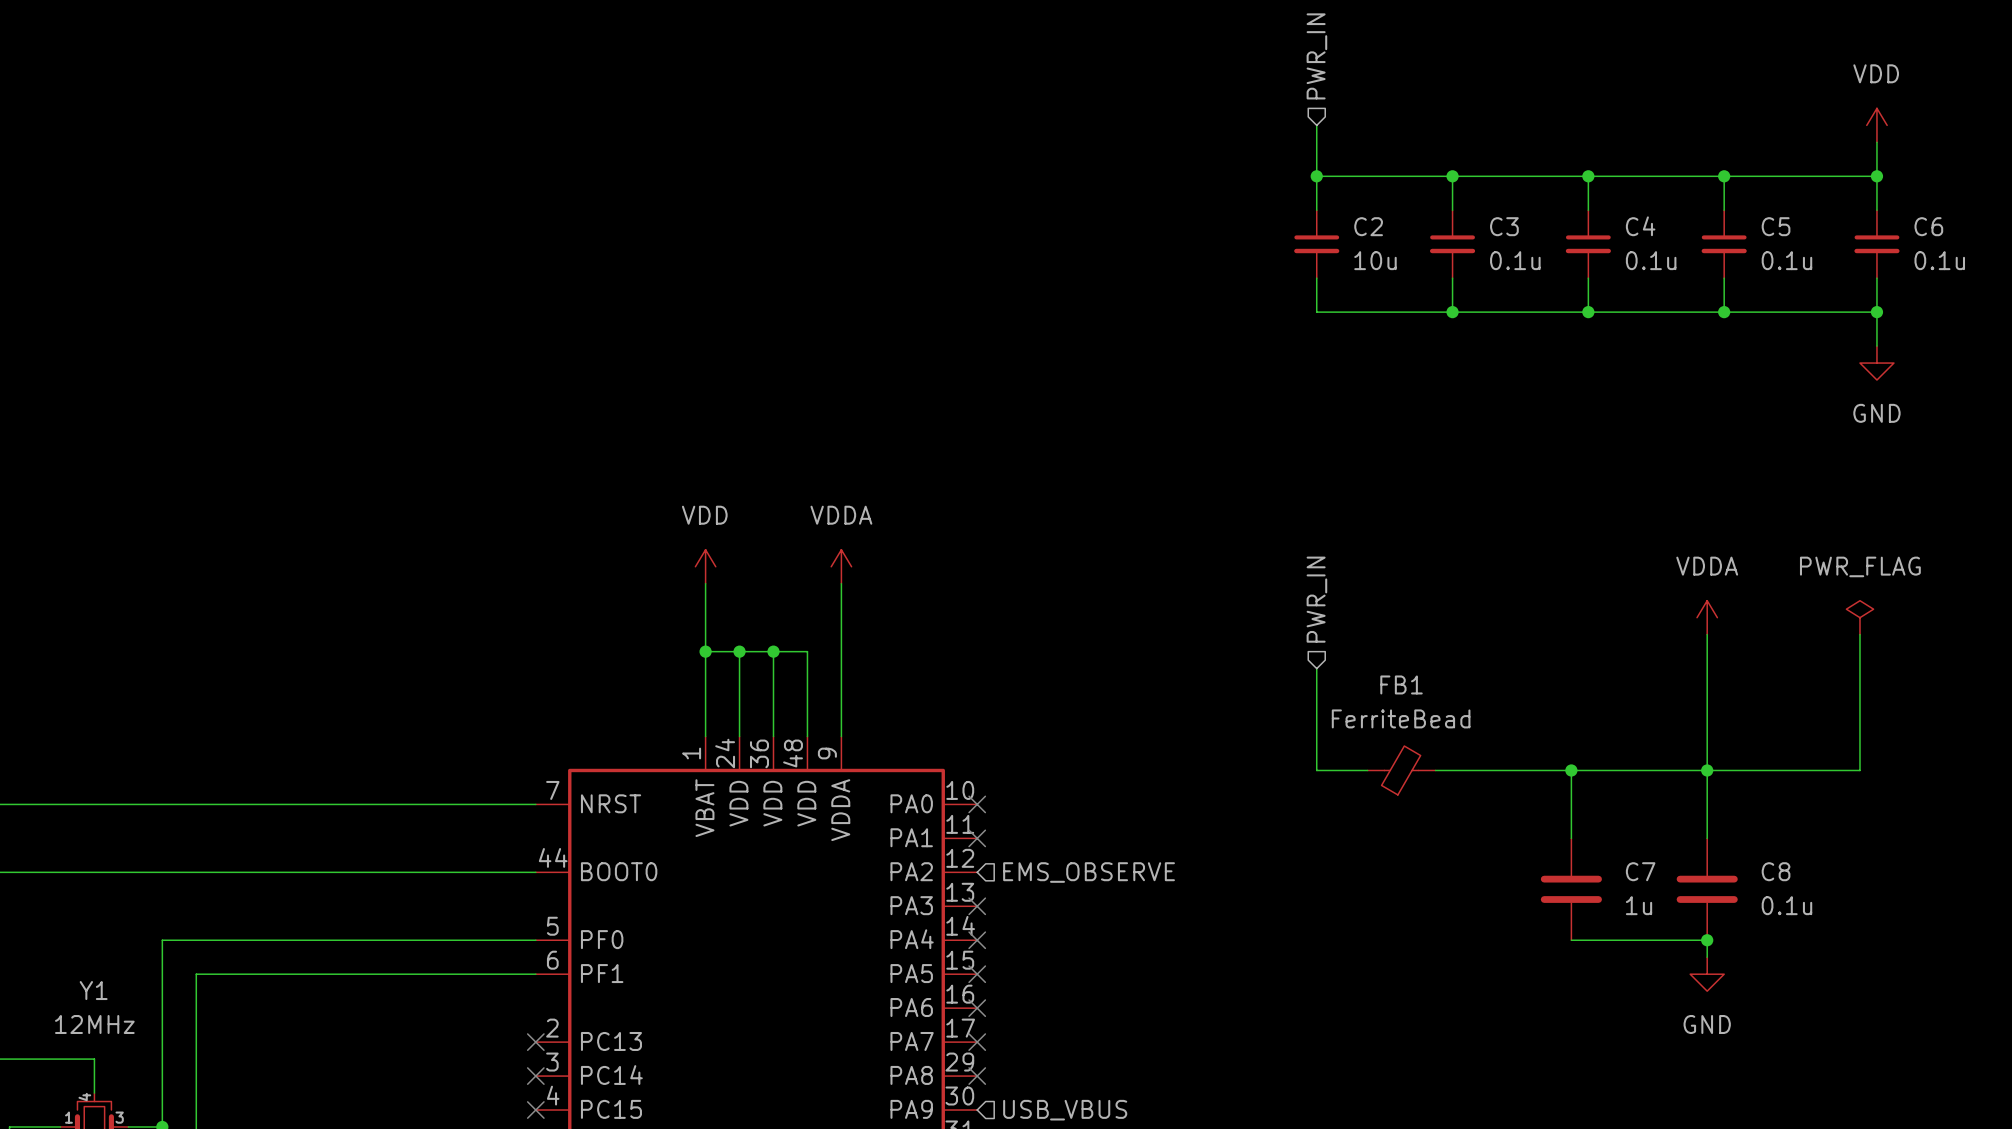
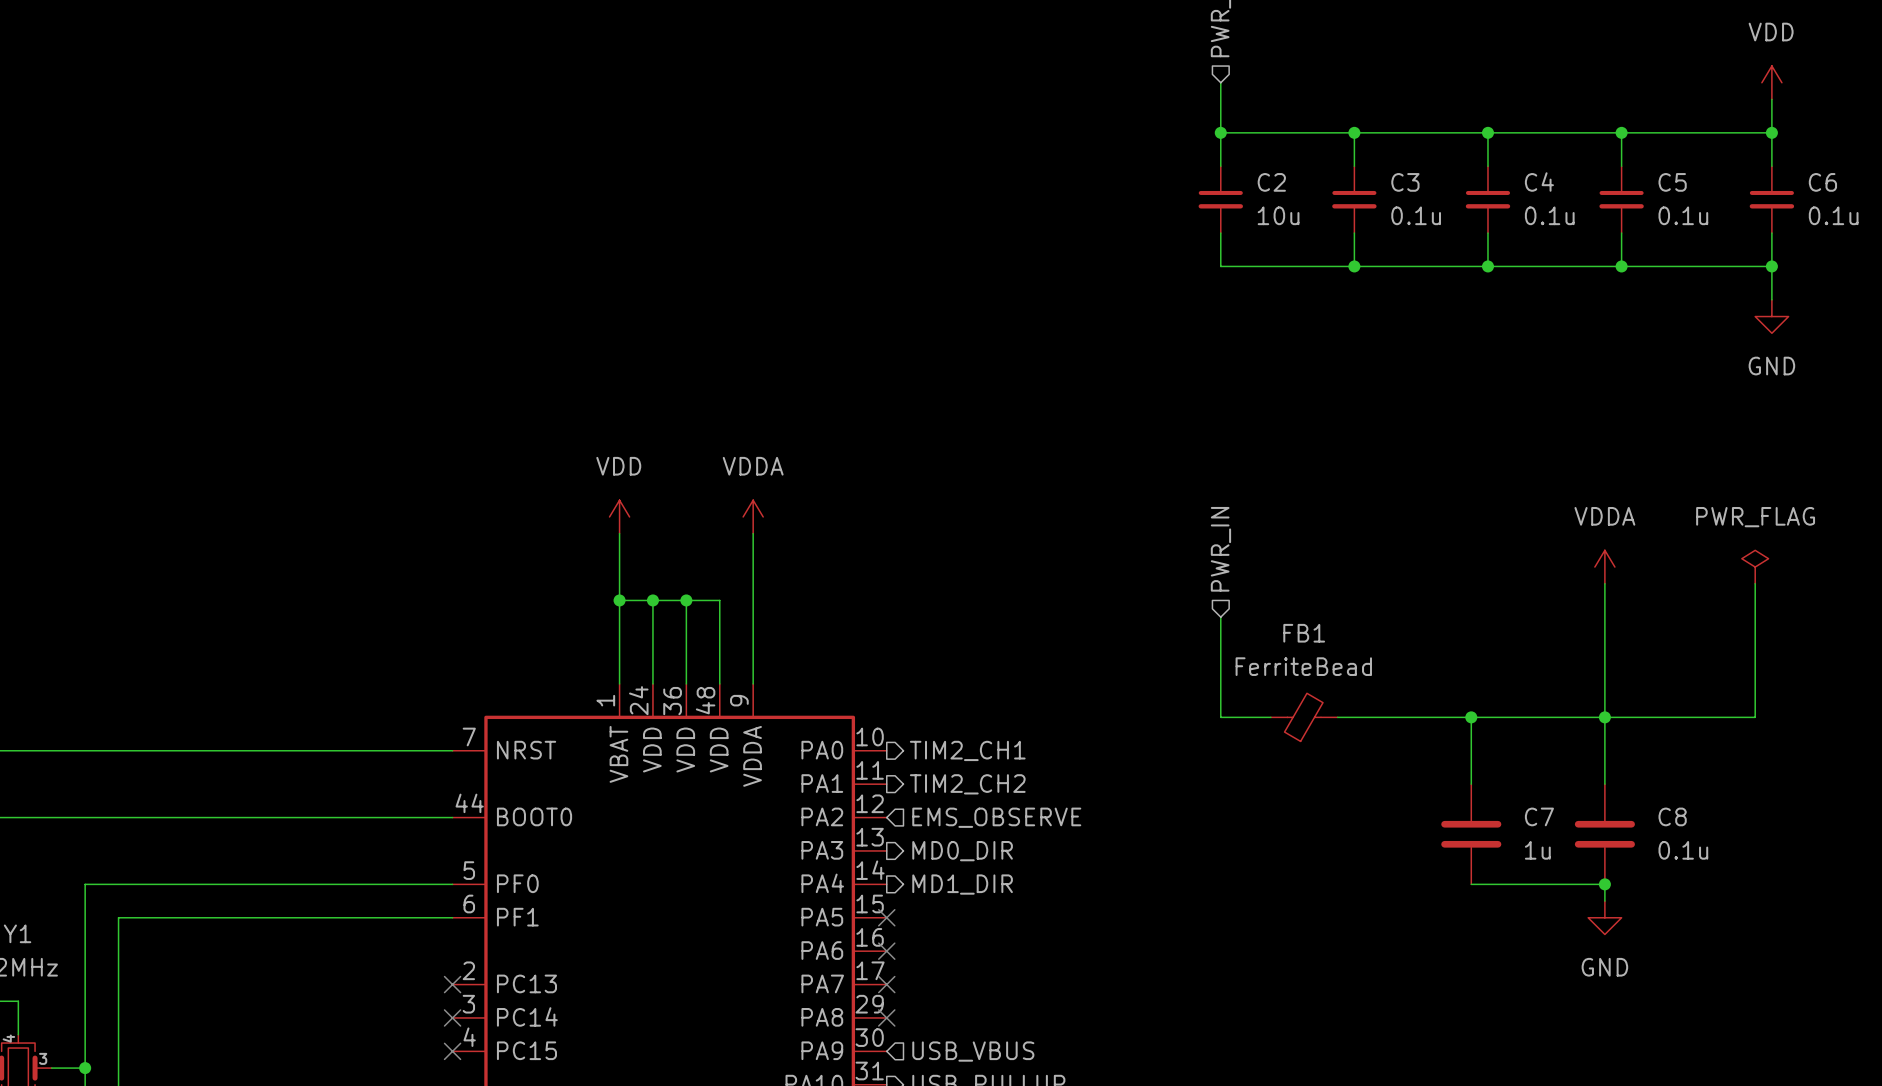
no-connect mark: (977, 804) -> none
hierarchical label: none -> TIM2_CH1 (967, 750)
no-connect mark: (977, 838) -> none
hierarchical label: none -> TIM2_CH2 (967, 784)
no-connect mark: (977, 906) -> none
hierarchical label: none -> MD0_DIR (962, 851)
no-connect mark: (977, 940) -> none
hierarchical label: none -> MD1_DIR (962, 884)

